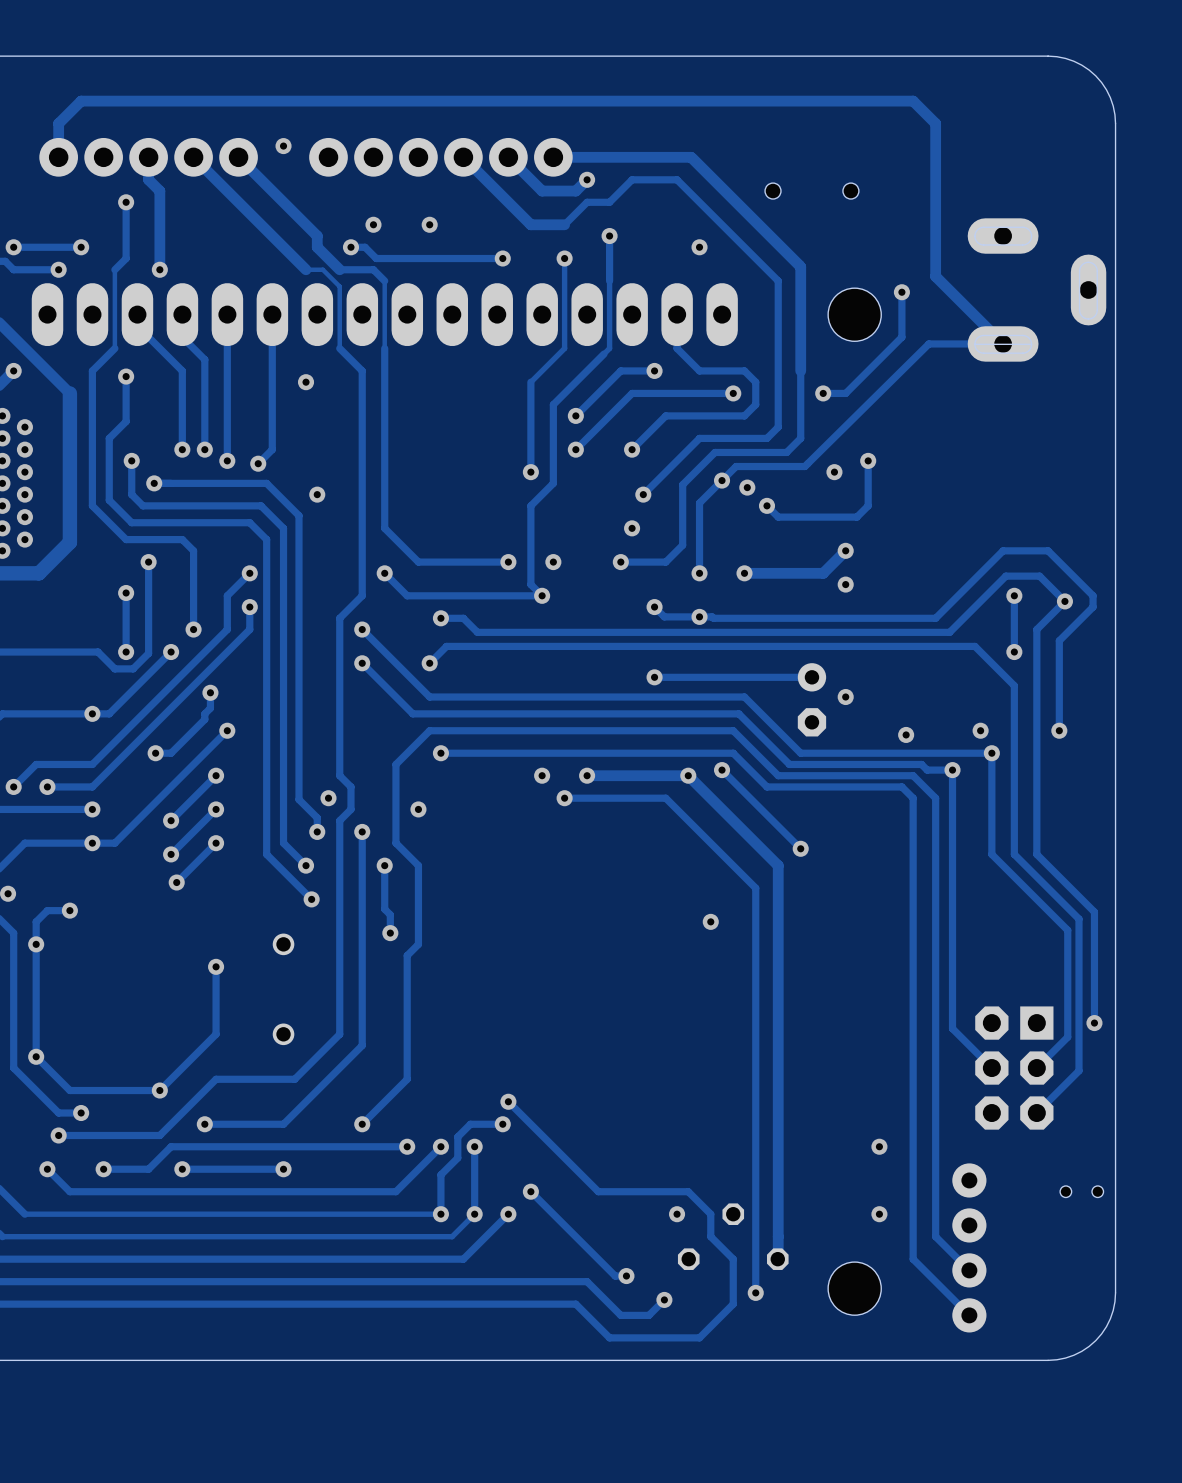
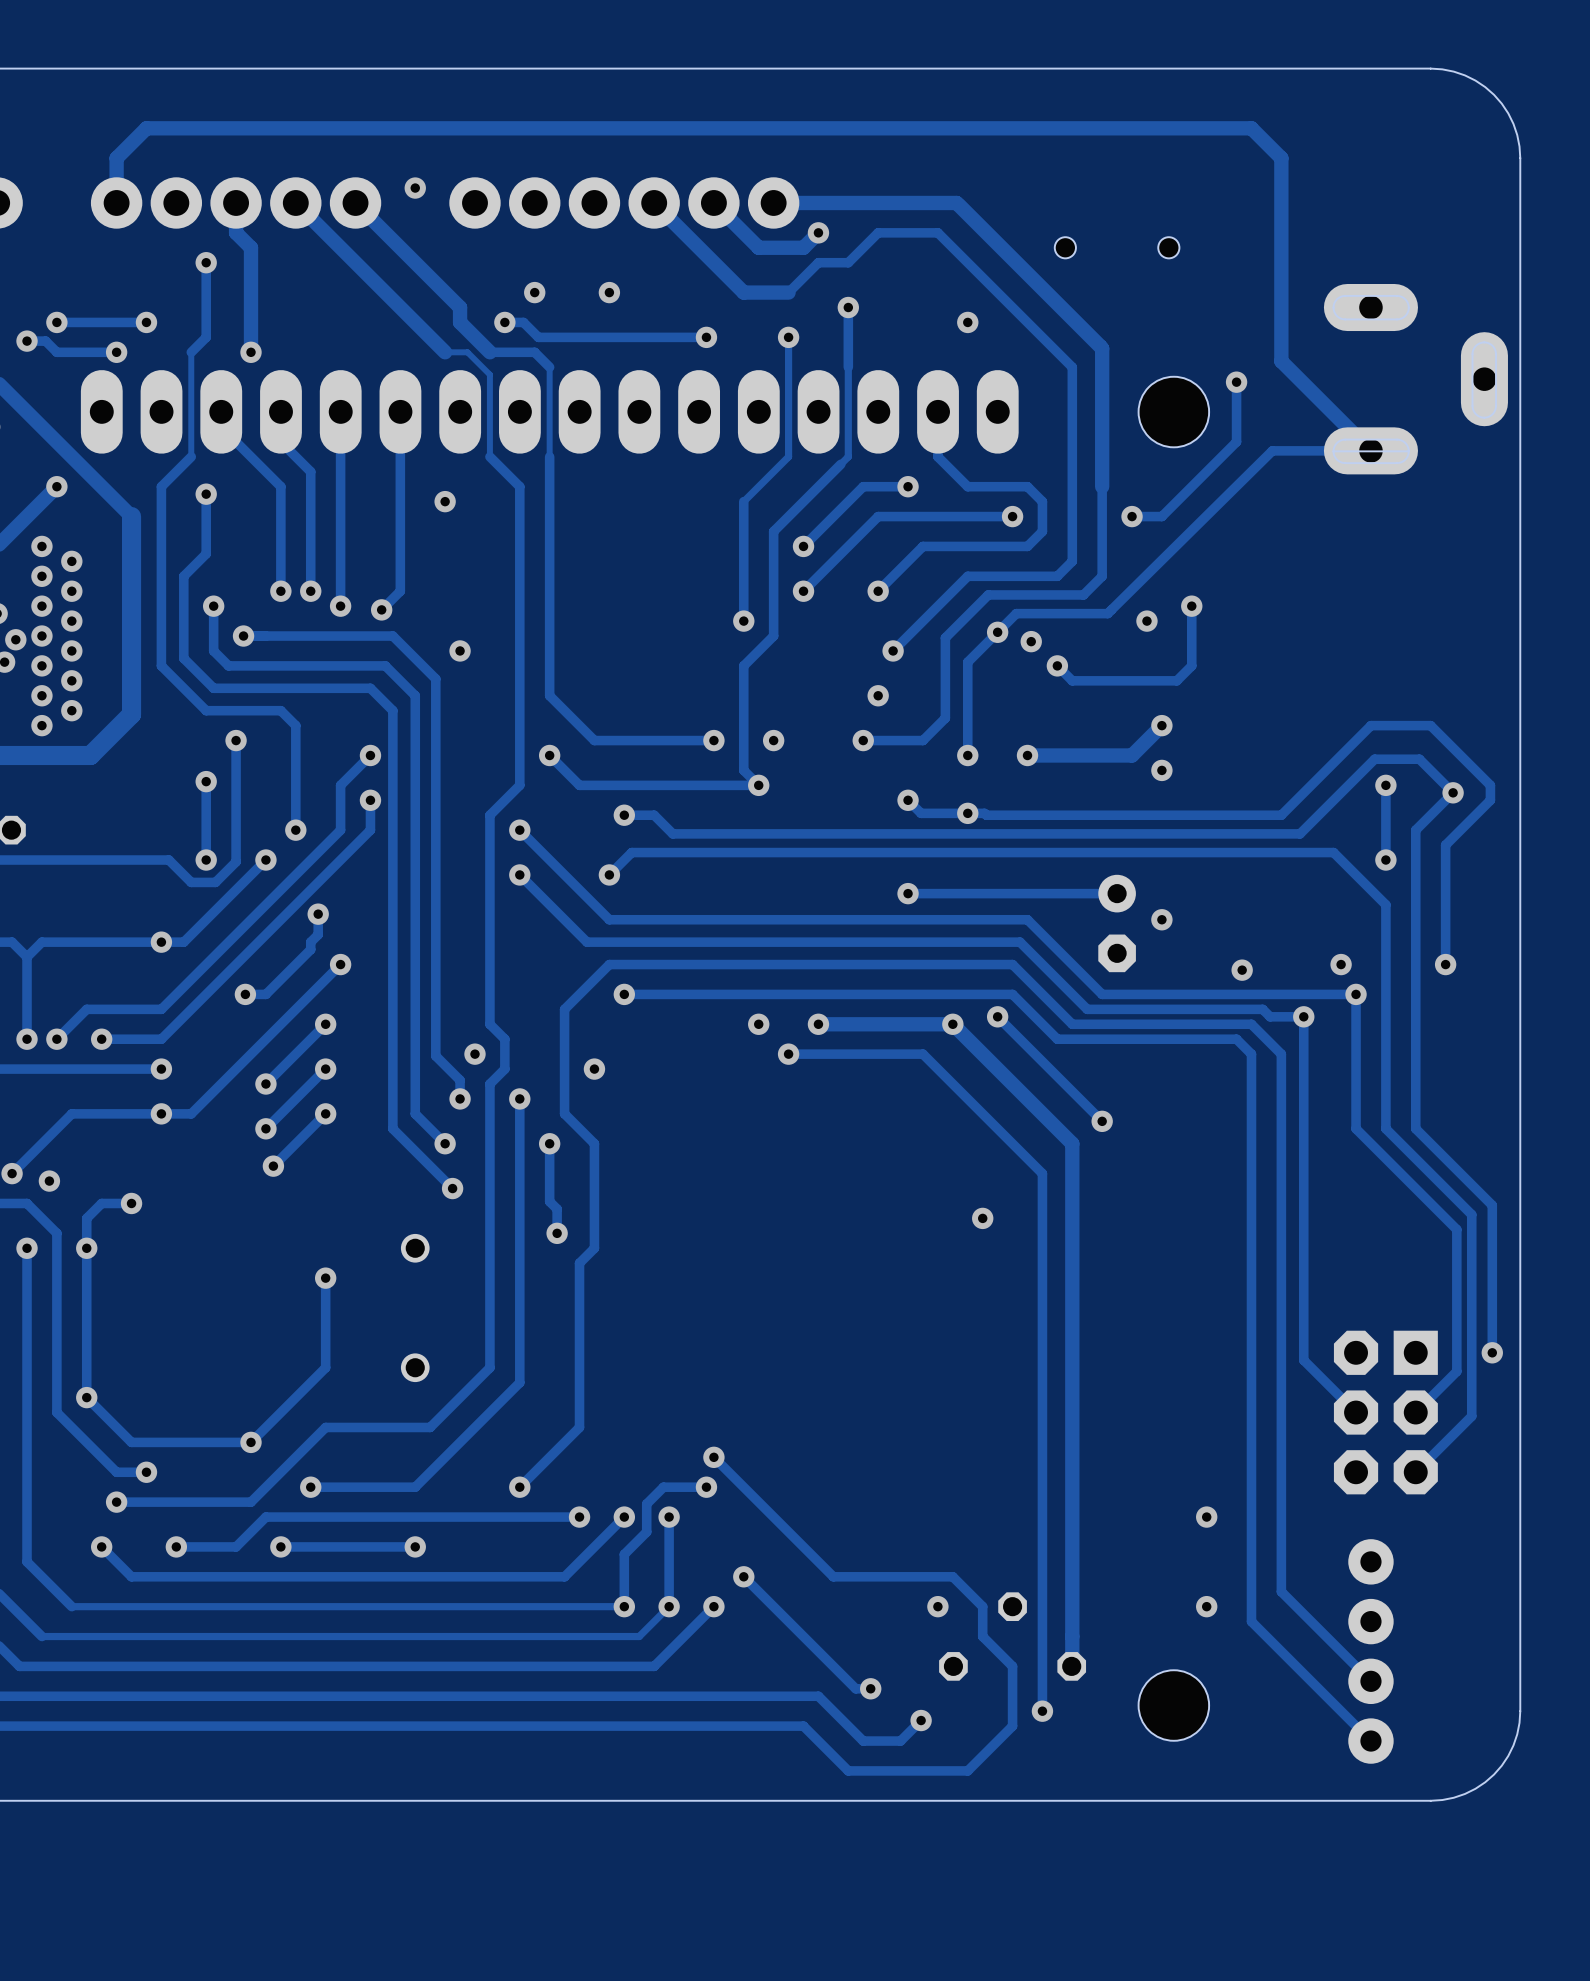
part: (1081, 1191) -> none
track: (935, 1202) (935, 1236) (969, 1270) -> (1281, 1591) (1370, 1681)
track: (913, 1225) (913, 1259) (969, 1315) -> (1251, 1621) (1370, 1741)
part position: (969, 1247) -> (1370, 1651)

